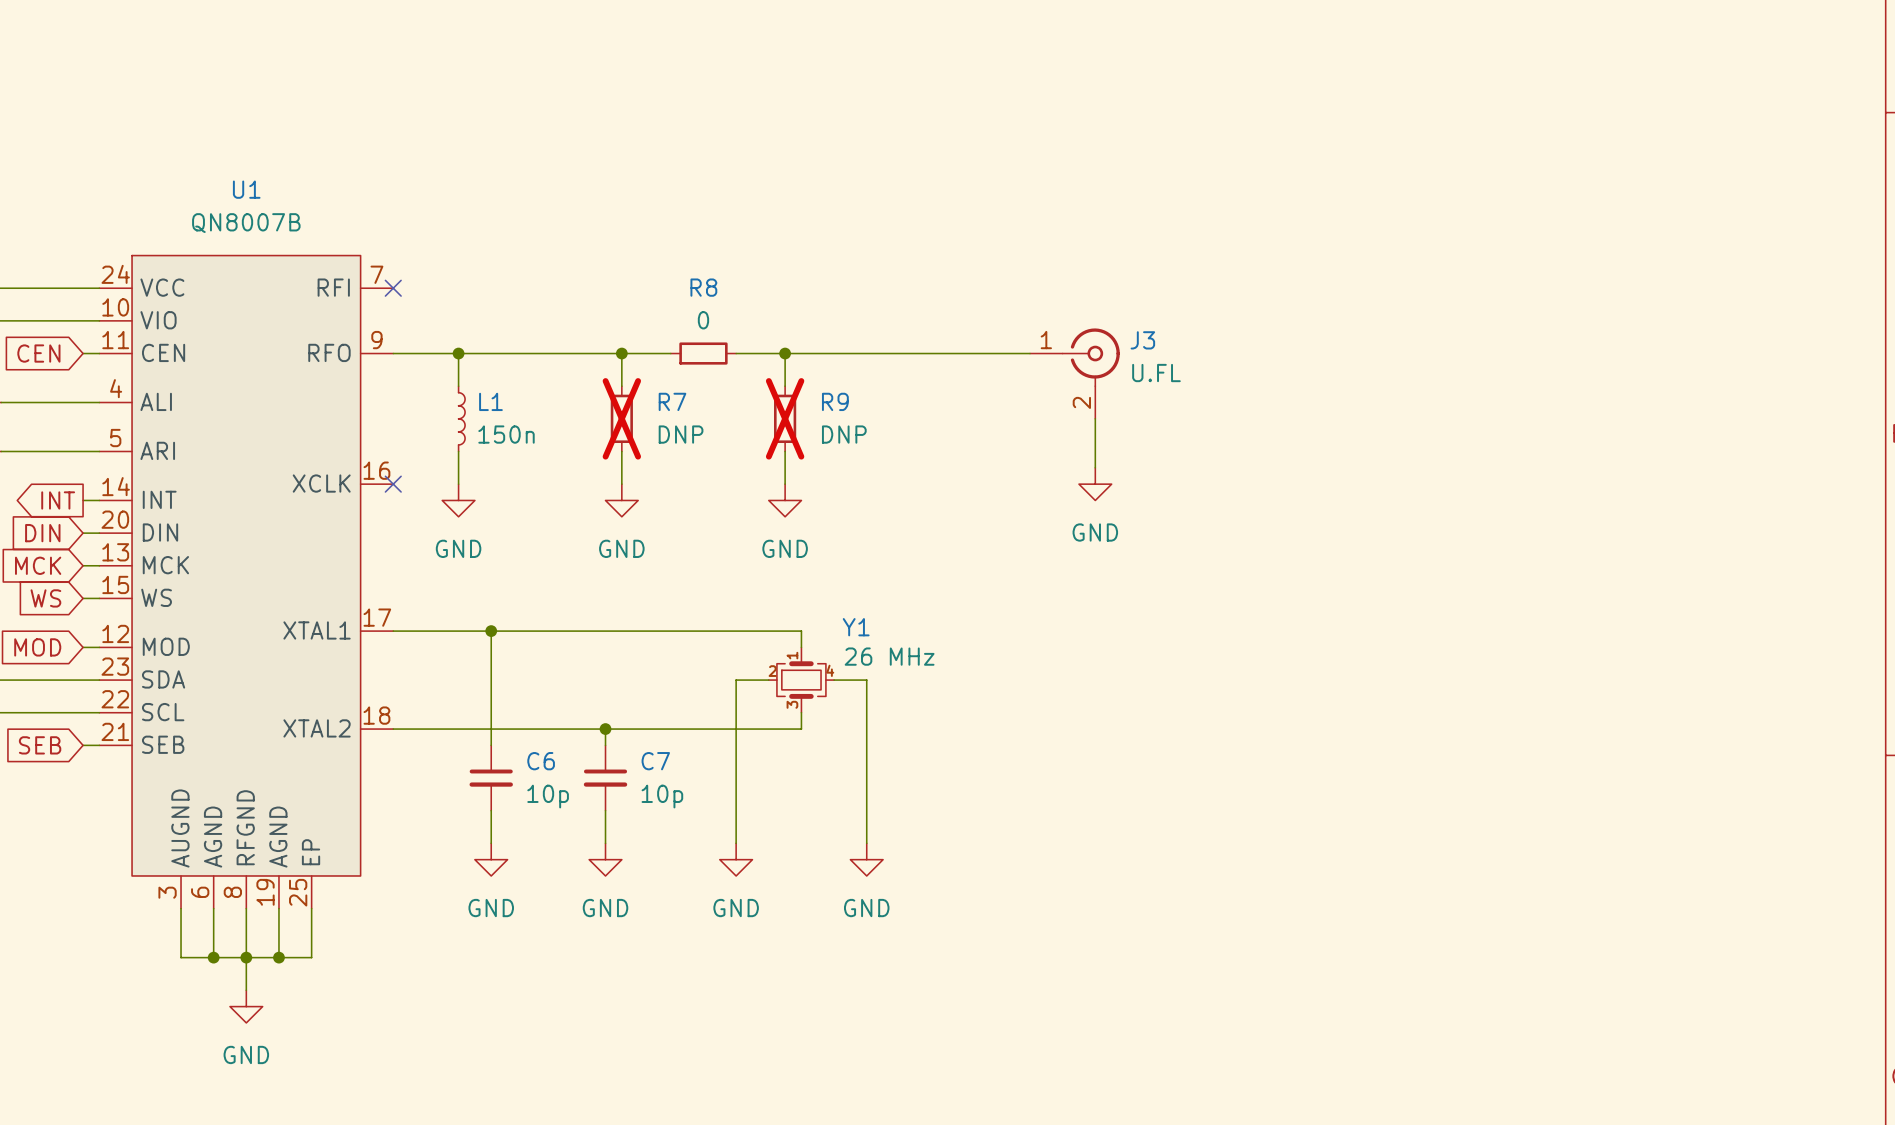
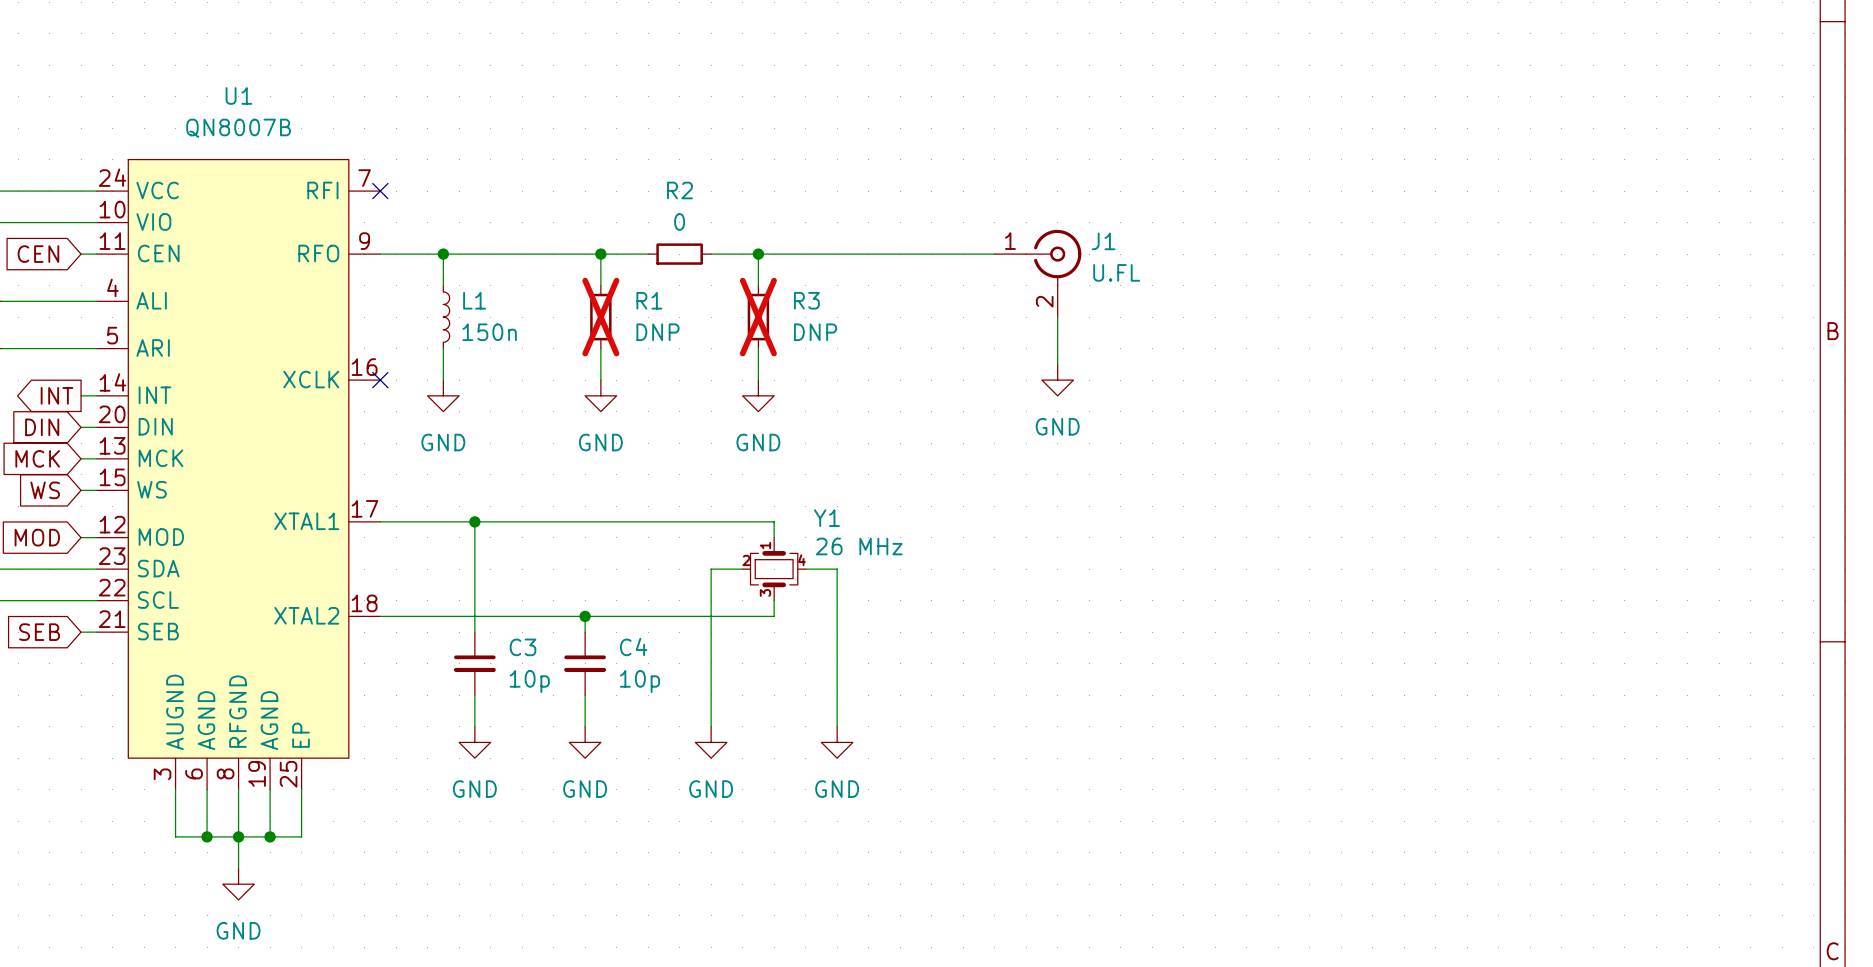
R8 name: R8 (703, 287) -> R2 (680, 190)
J3 name: J3 (1142, 340) -> J1 (1103, 241)
R7 name: R7 (672, 401) -> R1 (649, 300)
R9 name: R9 (835, 401) -> R3 (806, 300)
C6 name: C6 (541, 761) -> C3 (522, 647)
C7 name: C7 (655, 761) -> C4 (633, 647)

